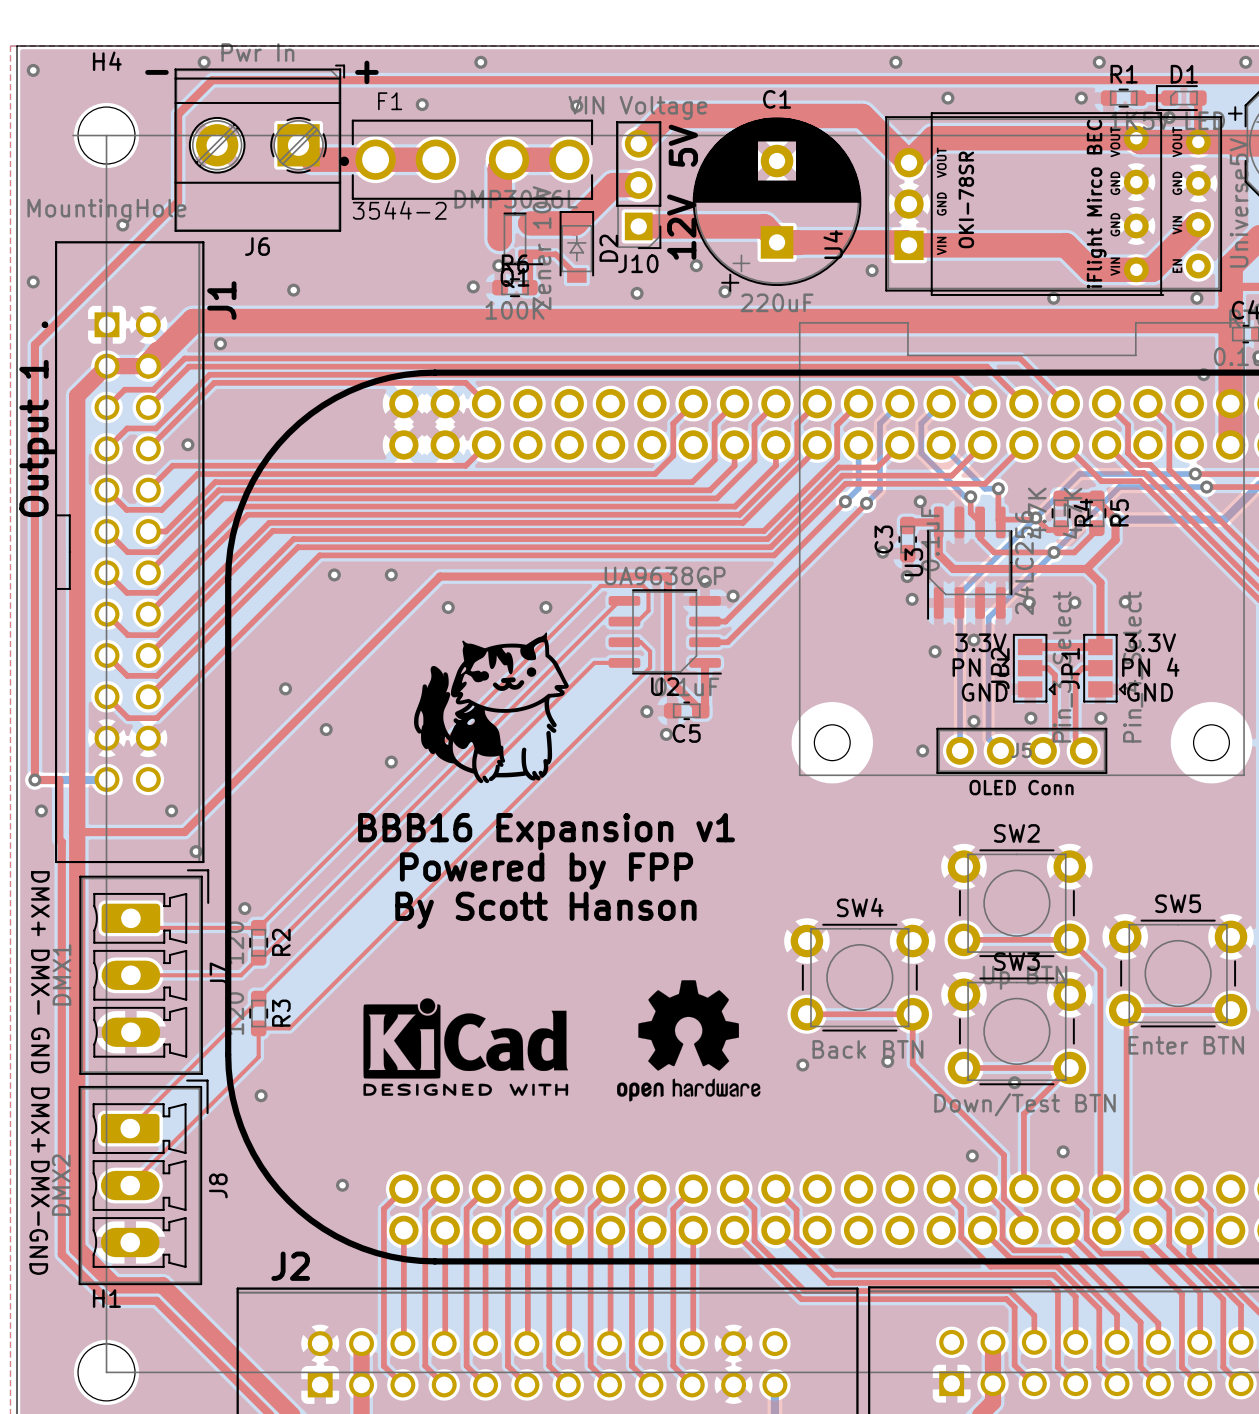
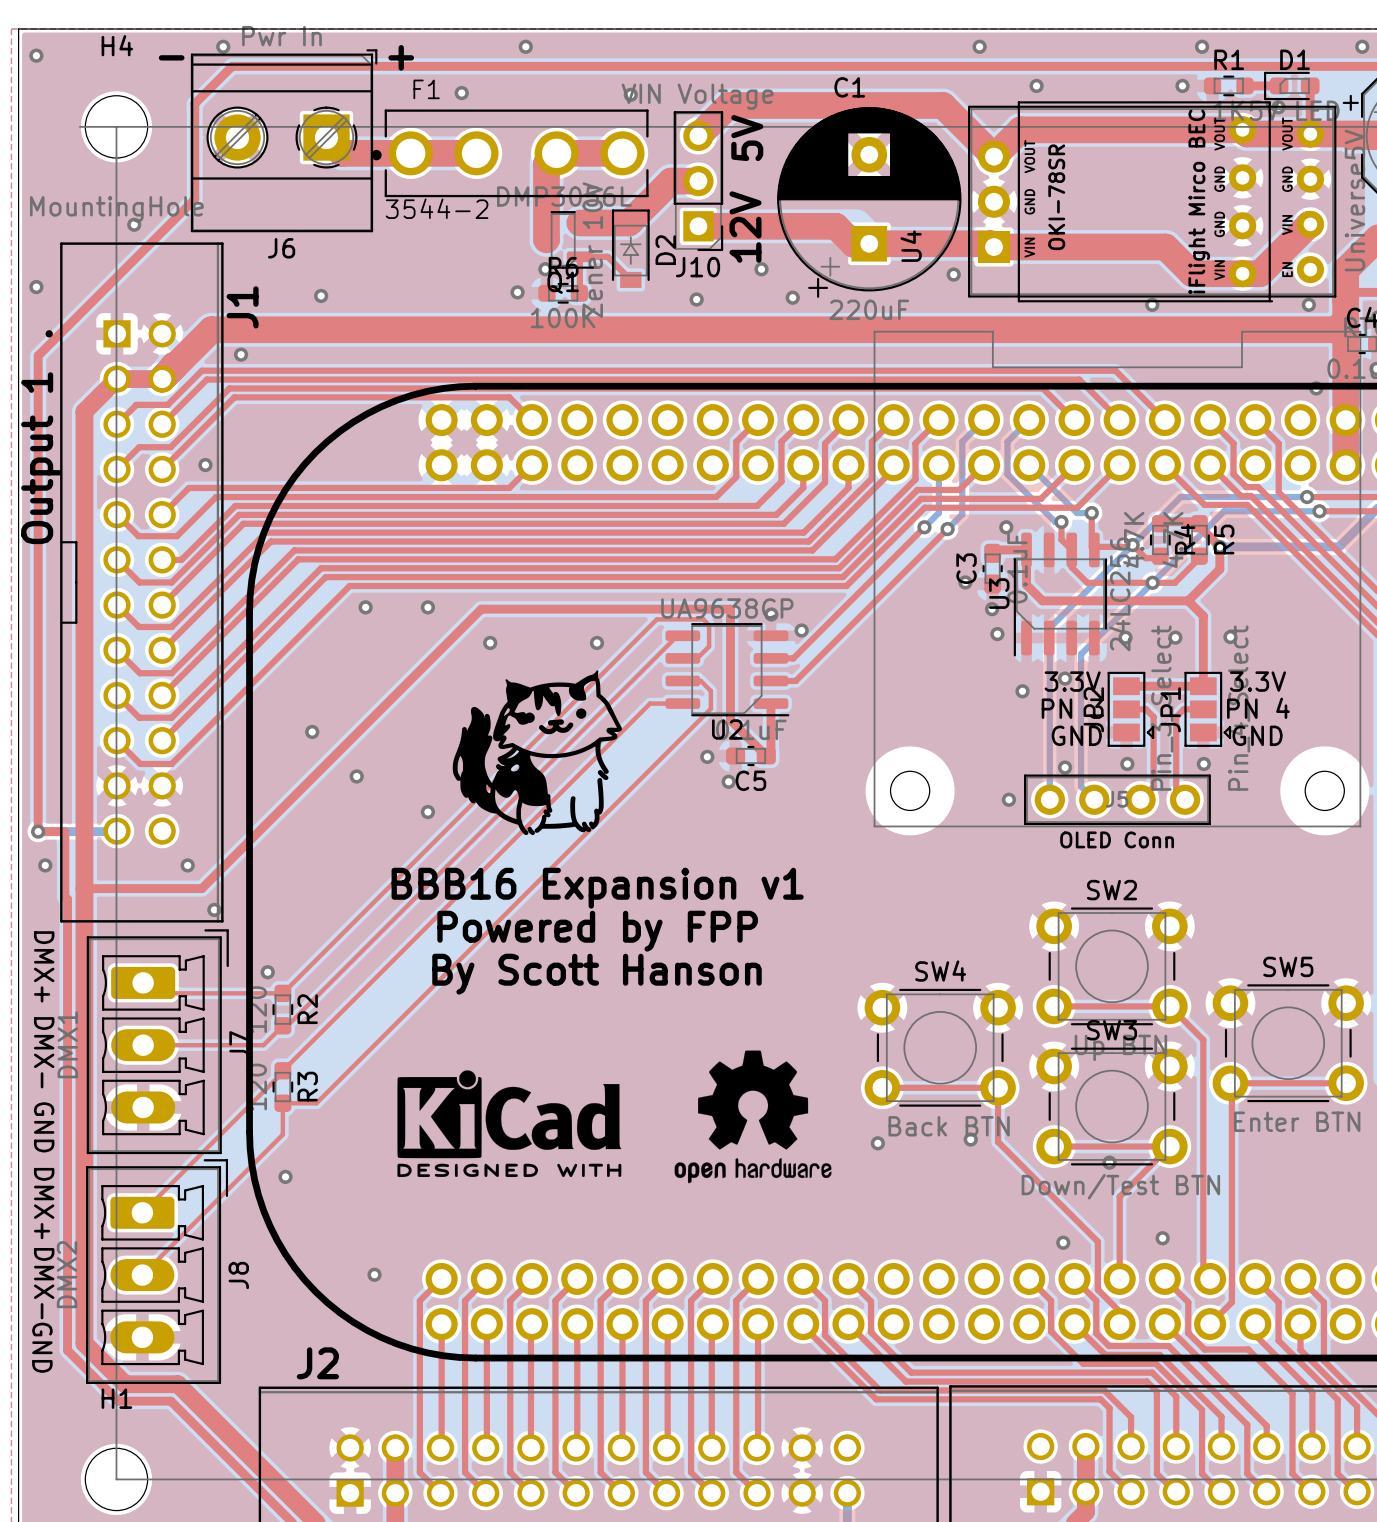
C1 position: (777, 204) -> (869, 202)

